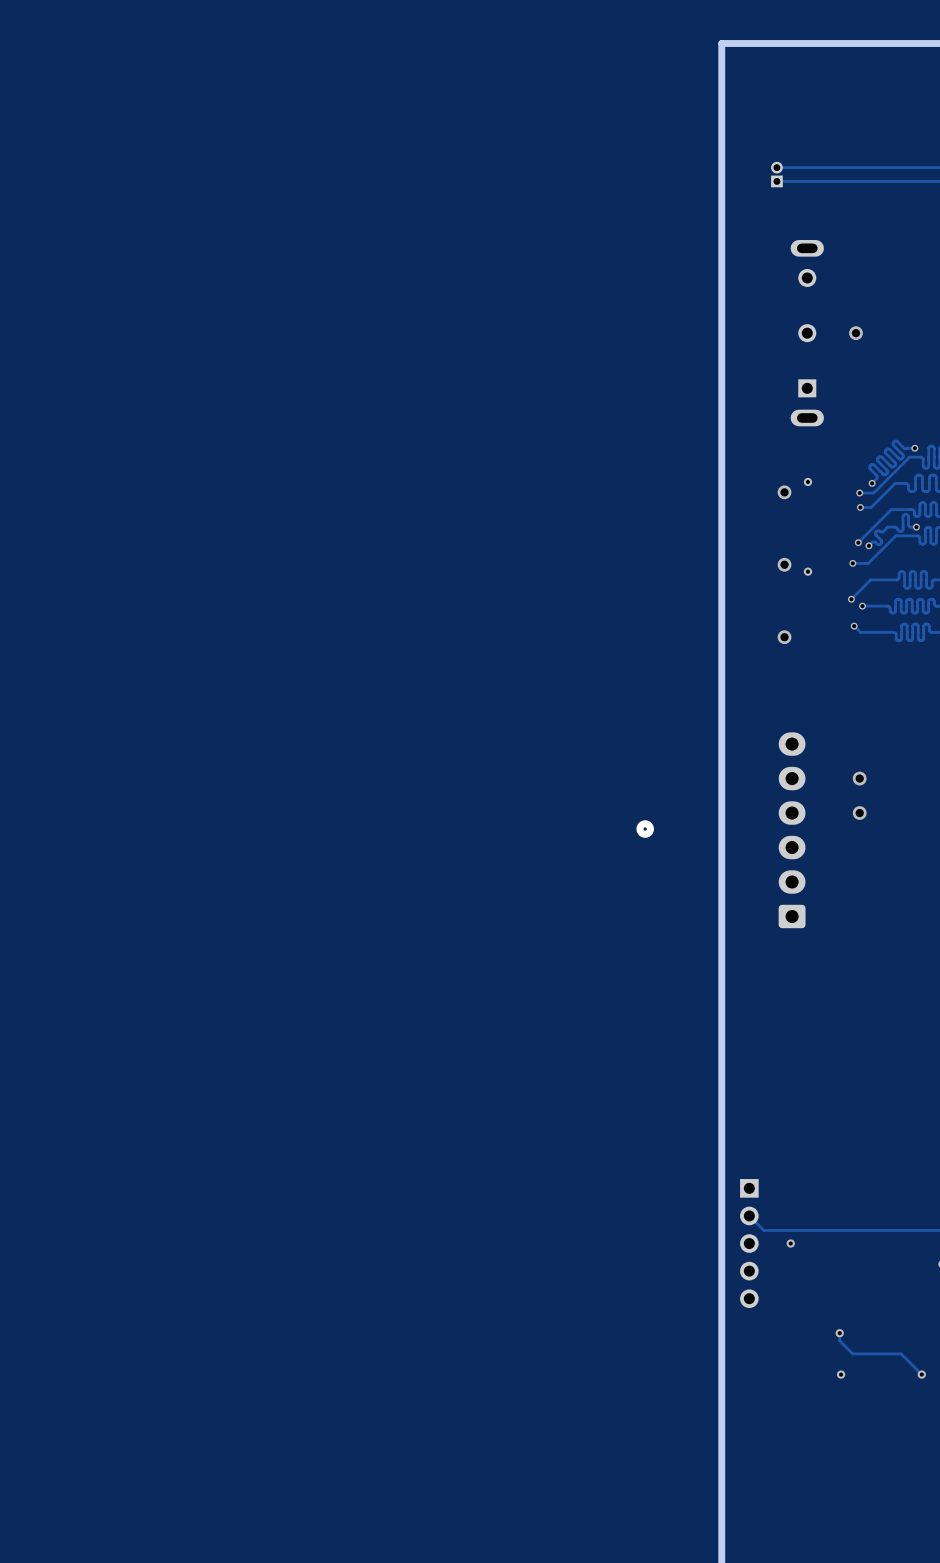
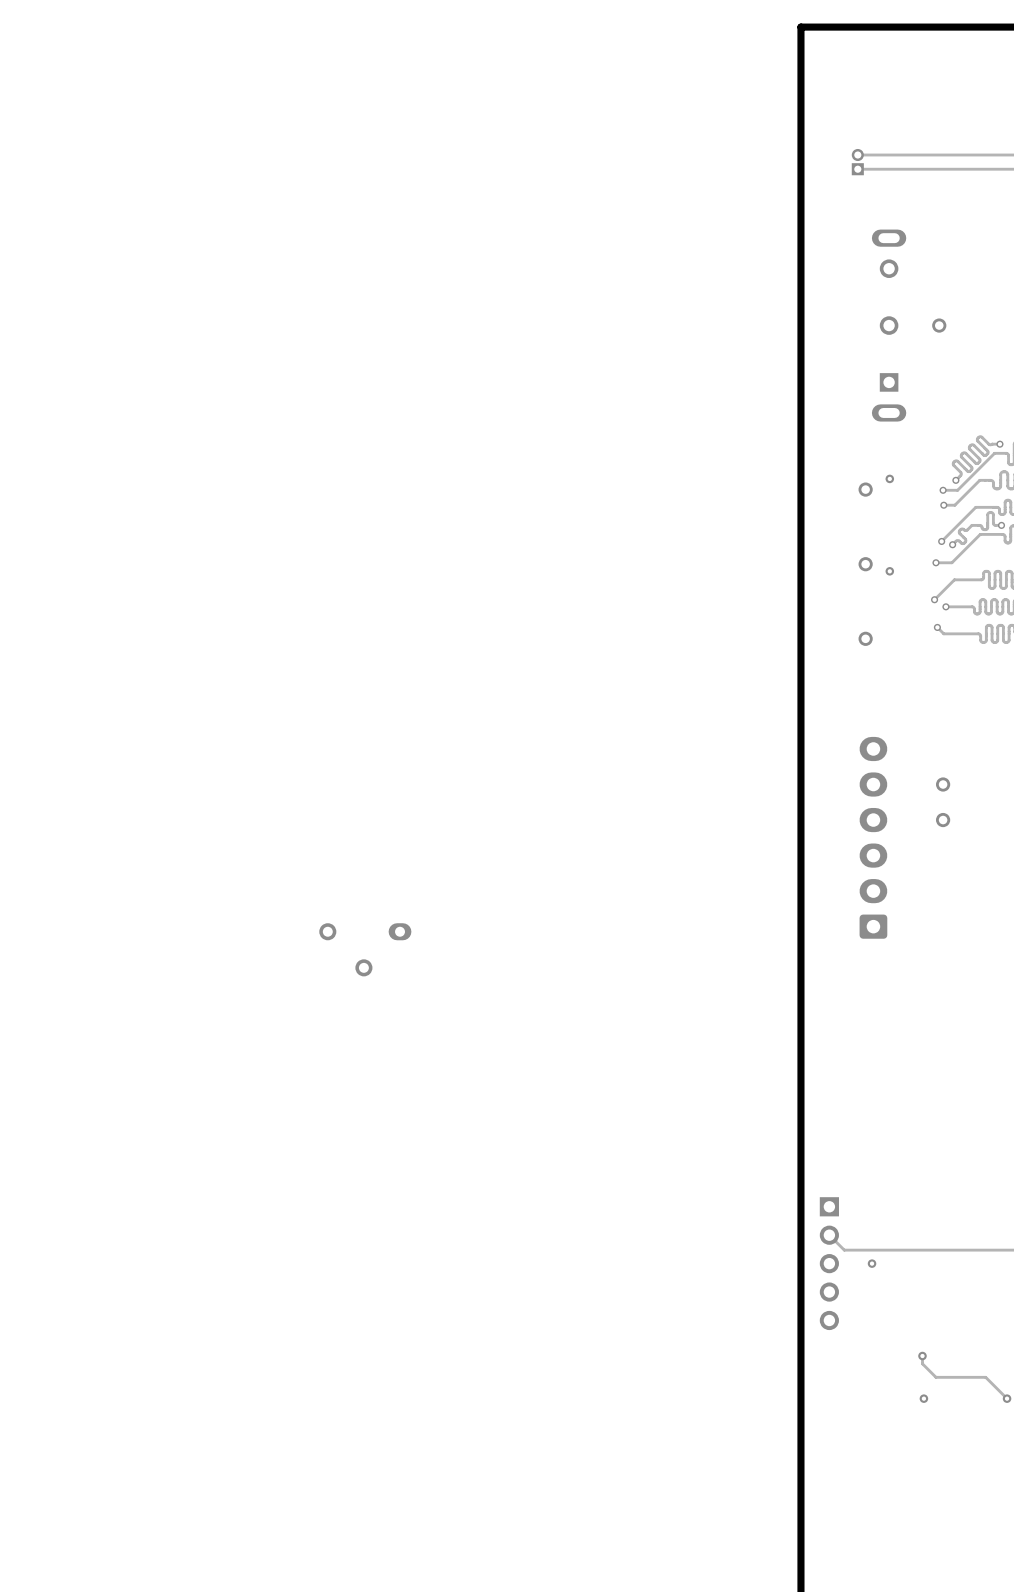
part: (645, 829) -> none
part: none -> (365, 949)

